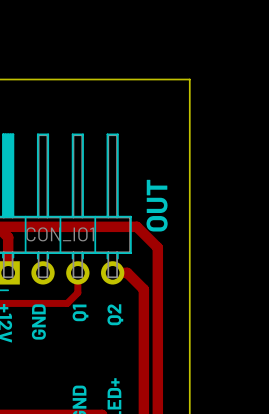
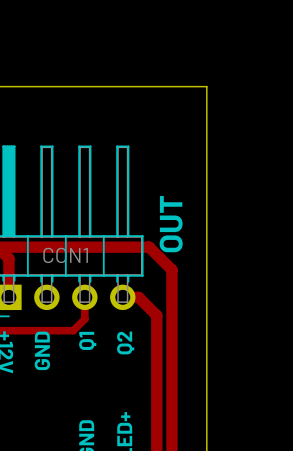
CON_IO1 name: CON_IO1 (60, 234) -> CON1 (65, 255)

